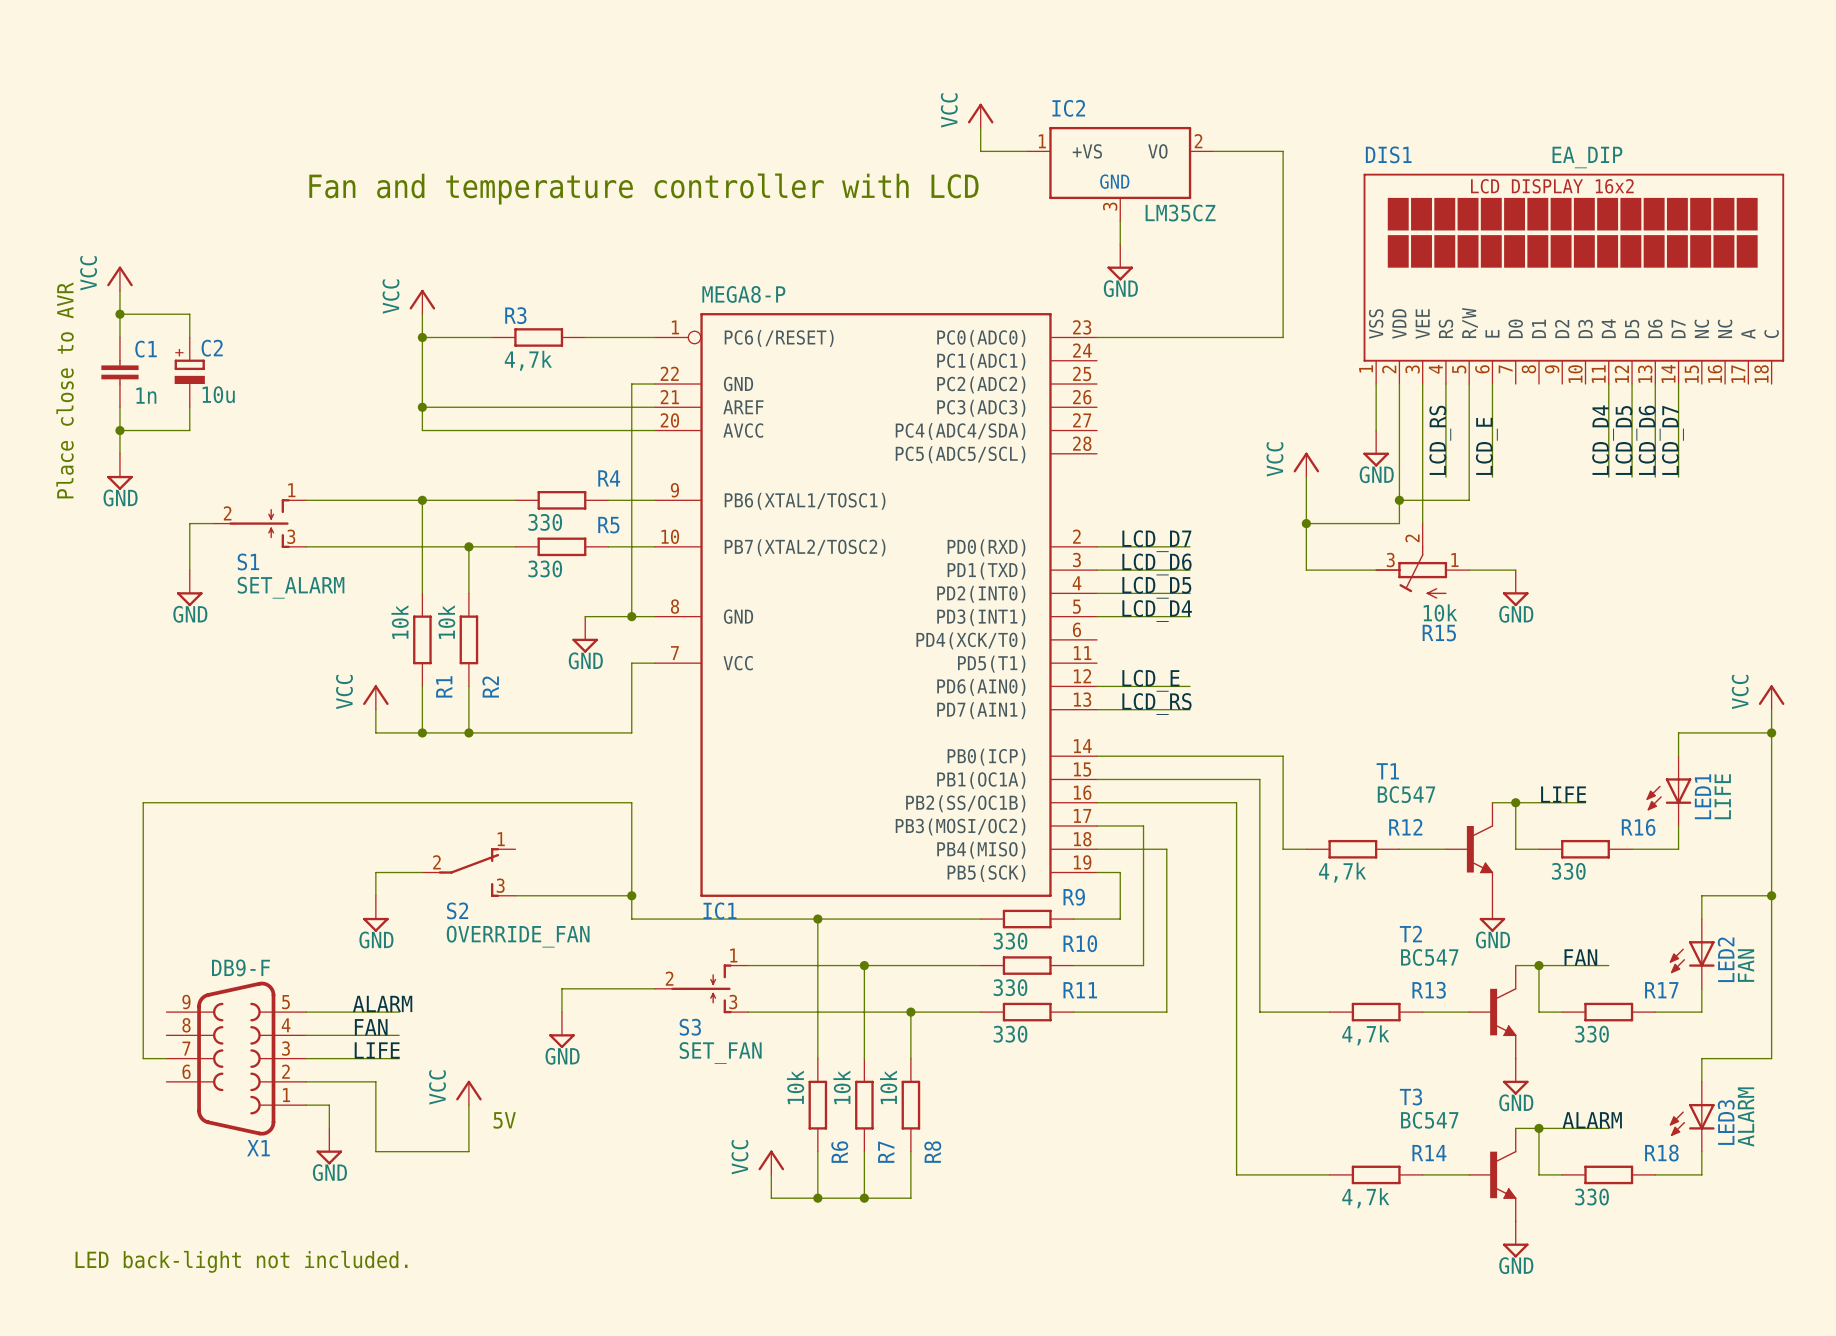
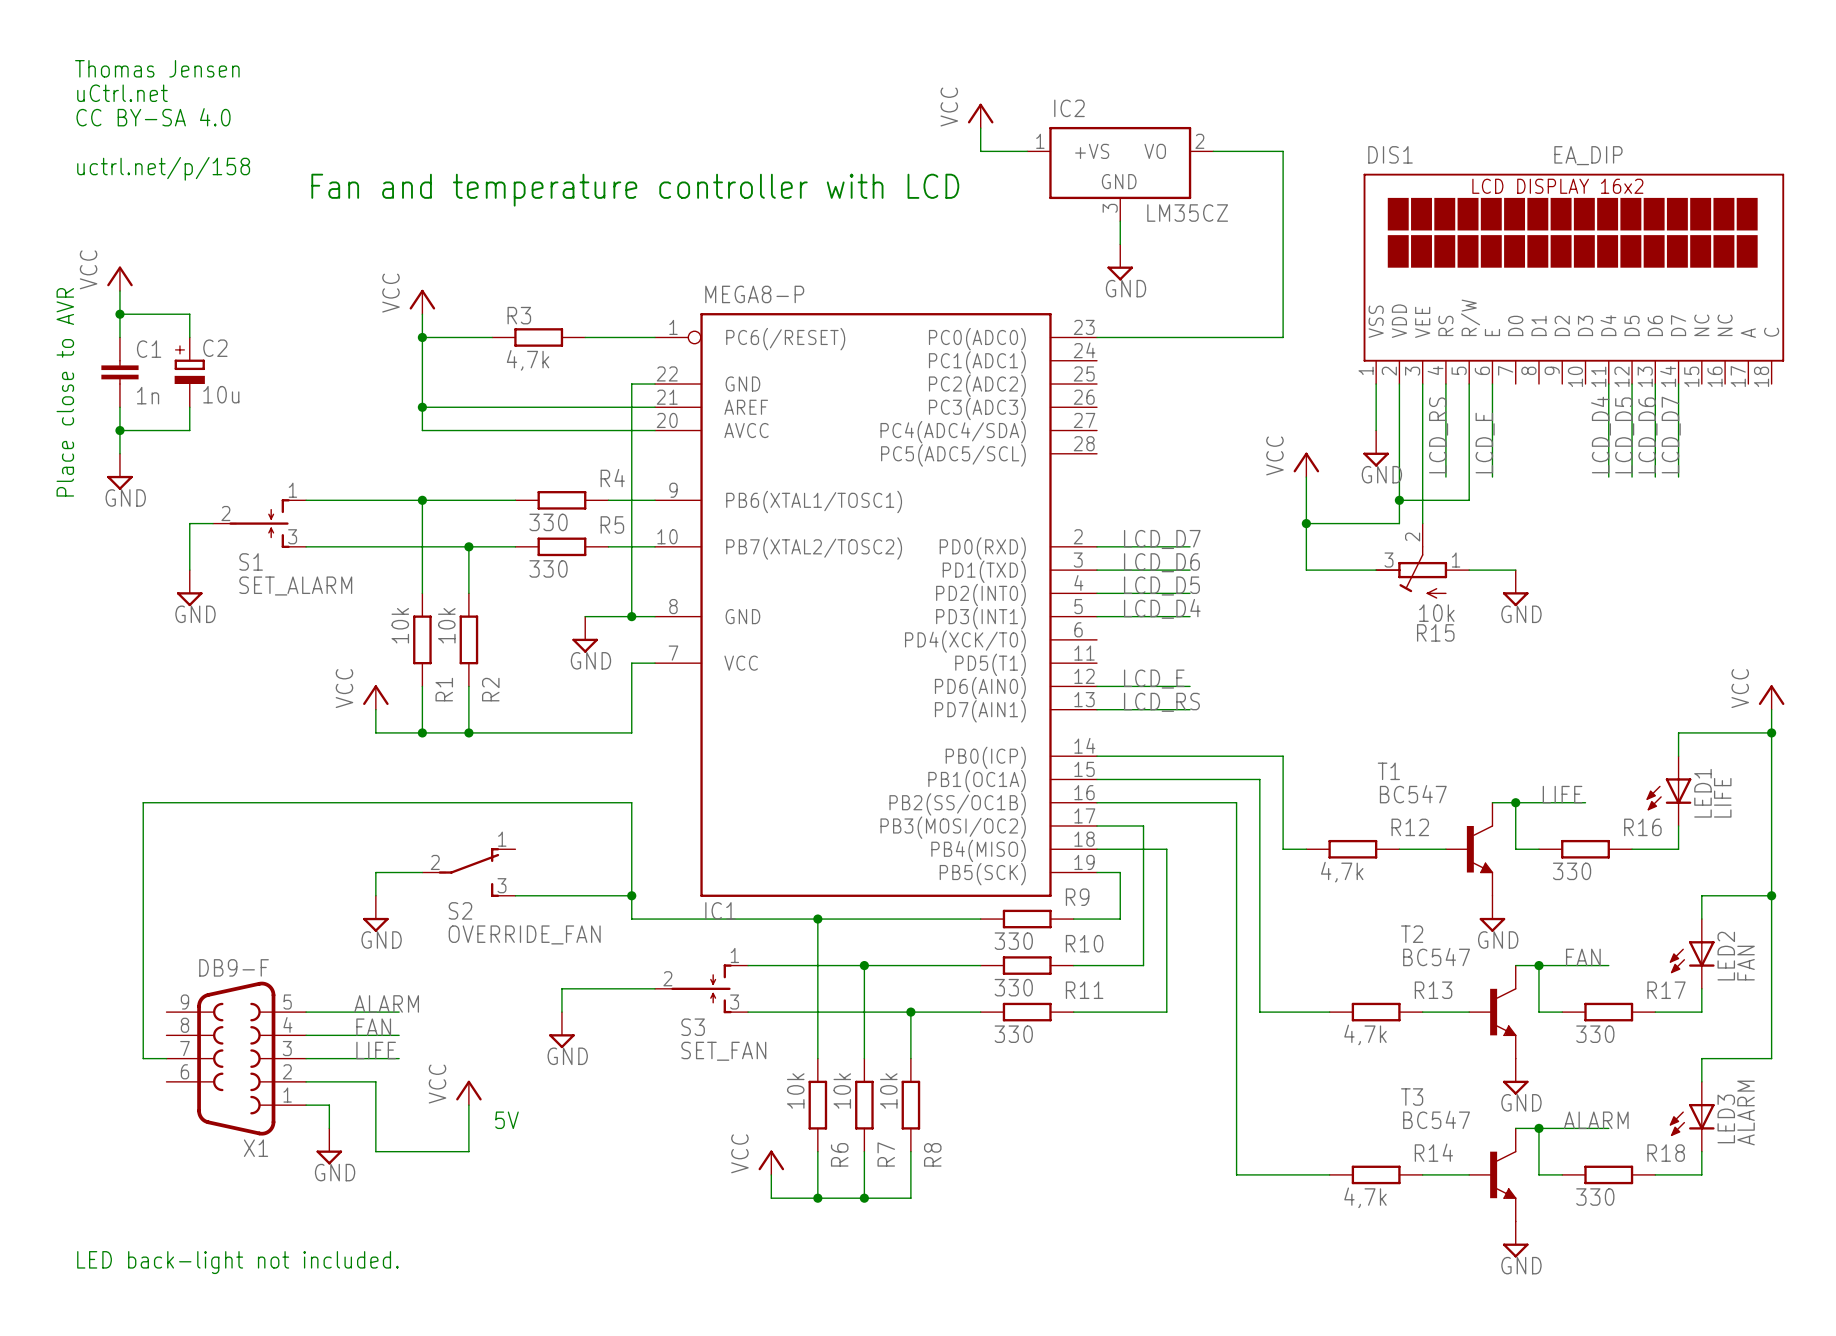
text: none -> Thomas Jensen (157, 68)
text: none -> uCtrl.net (122, 93)
text: none -> CC BY-SA 4.0 (153, 117)
text: none -> uctrl.net/p/158 (163, 168)

